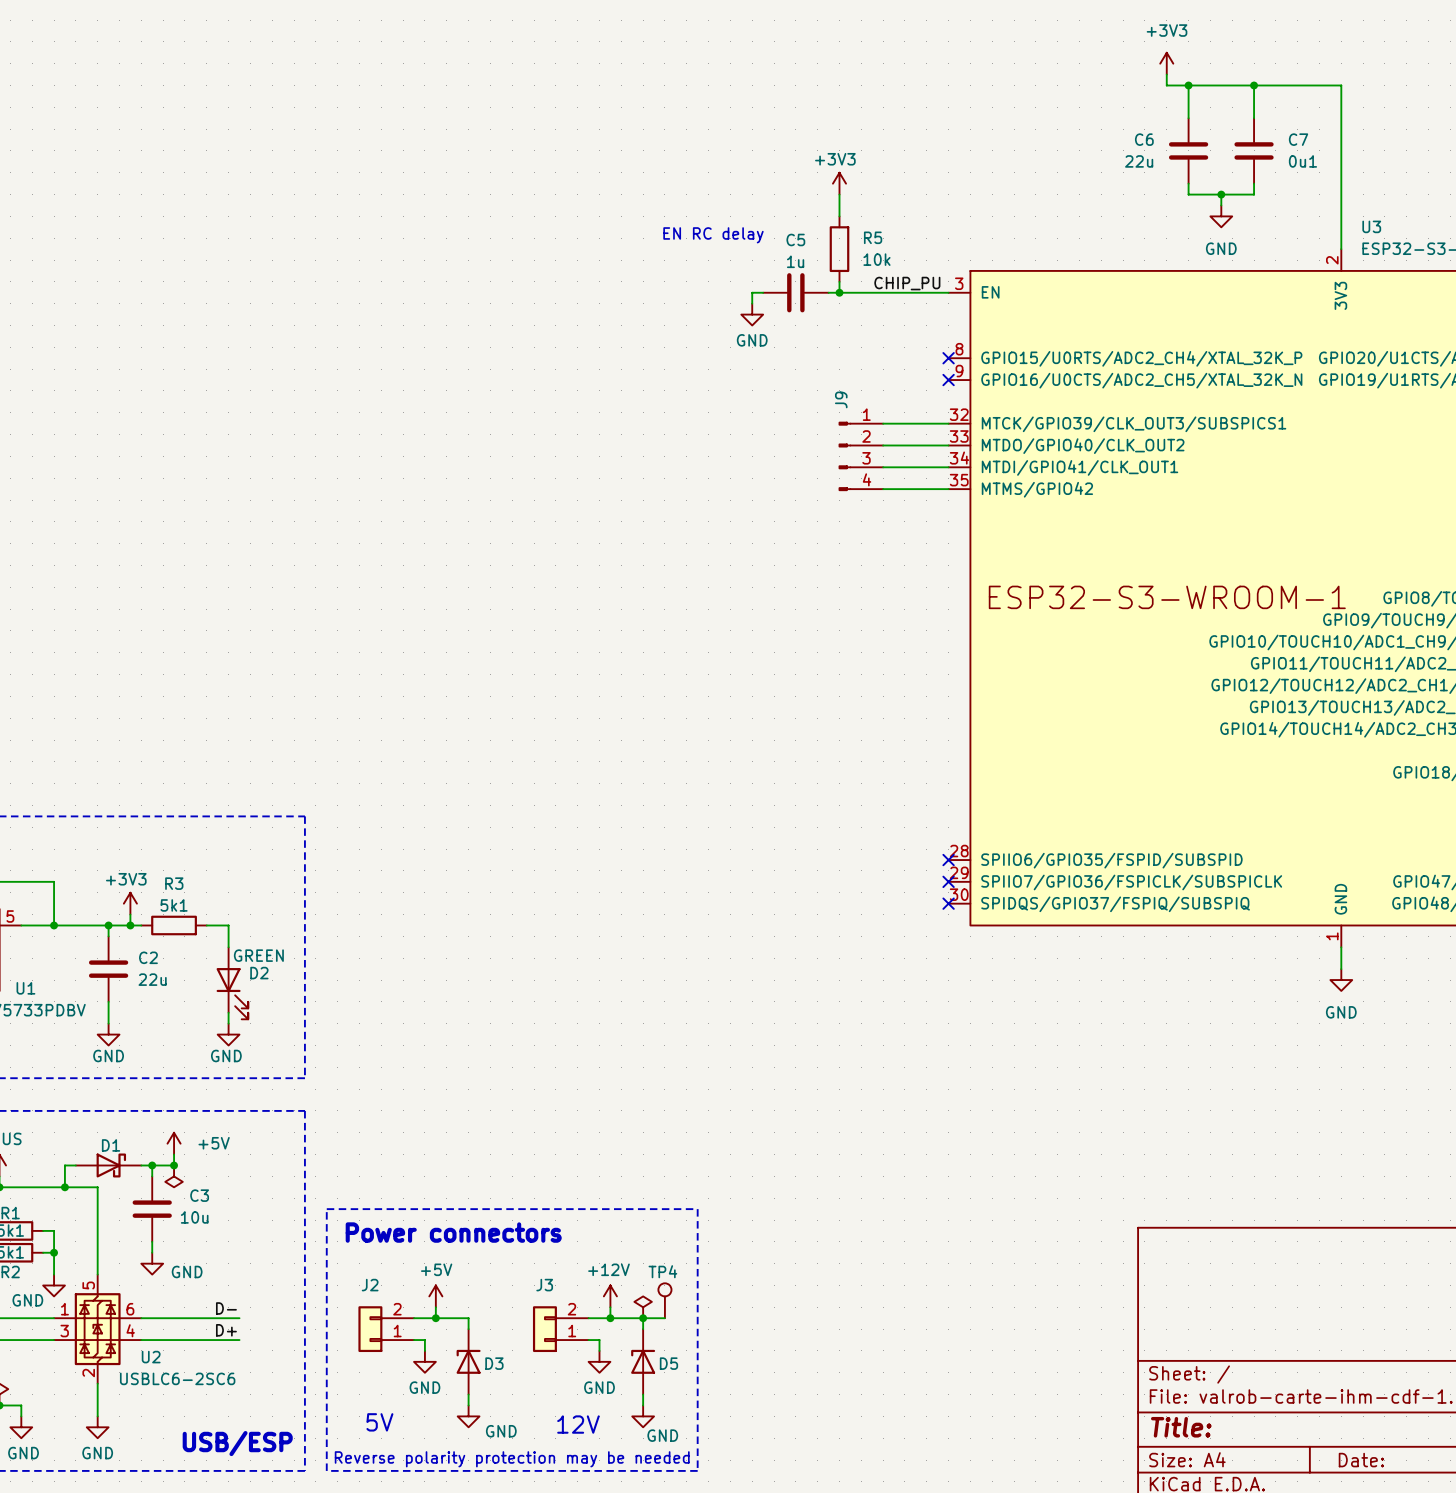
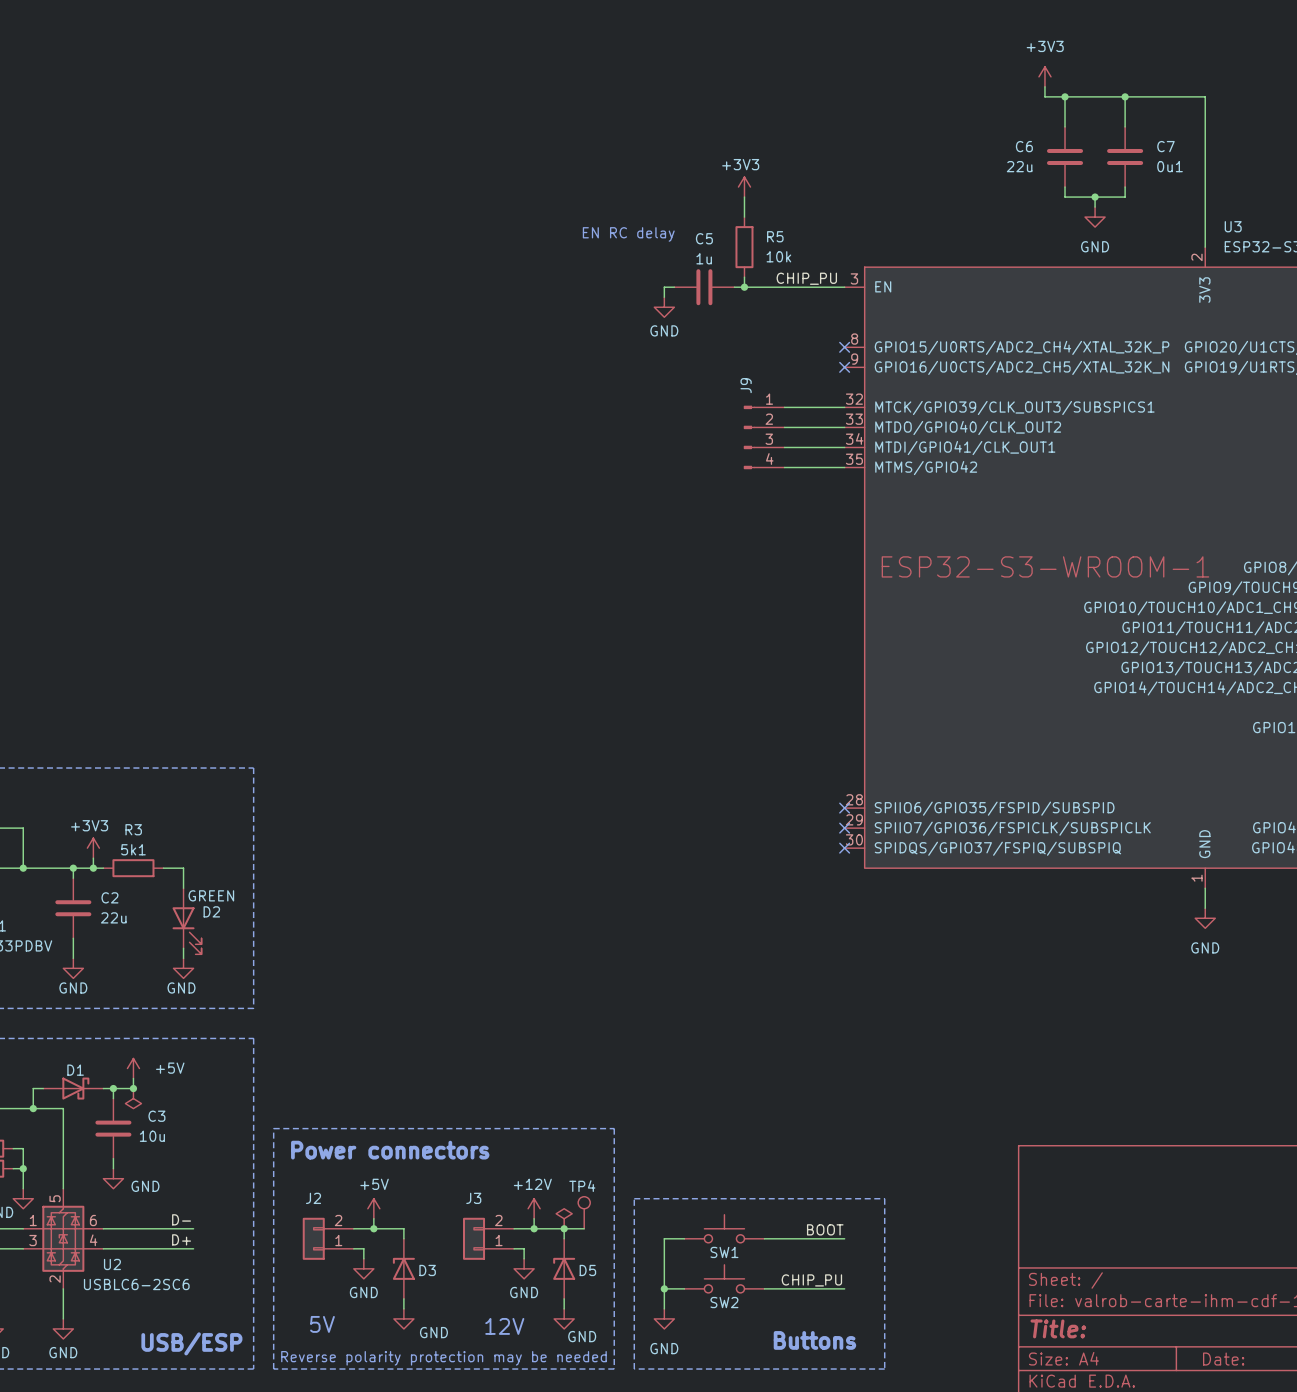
line: none -> (634, 1198) (884, 1198) (884, 1369) (634, 1369) (634, 1198)
SW1: none -> (724, 1228)
label: none -> BOOT (825, 1229)
wire: none -> (684, 1238) (664, 1238) (664, 1308)
wire: none -> (764, 1238) (844, 1238)
SW2: none -> (724, 1278)
label: none -> CHIP_PU (811, 1280)
wire: none -> (664, 1288) (684, 1288)
junction: none -> (664, 1288)
wire: none -> (764, 1288) (844, 1288)
power symbol: none -> GND (664, 1318)
text: none -> Buttons (814, 1340)

